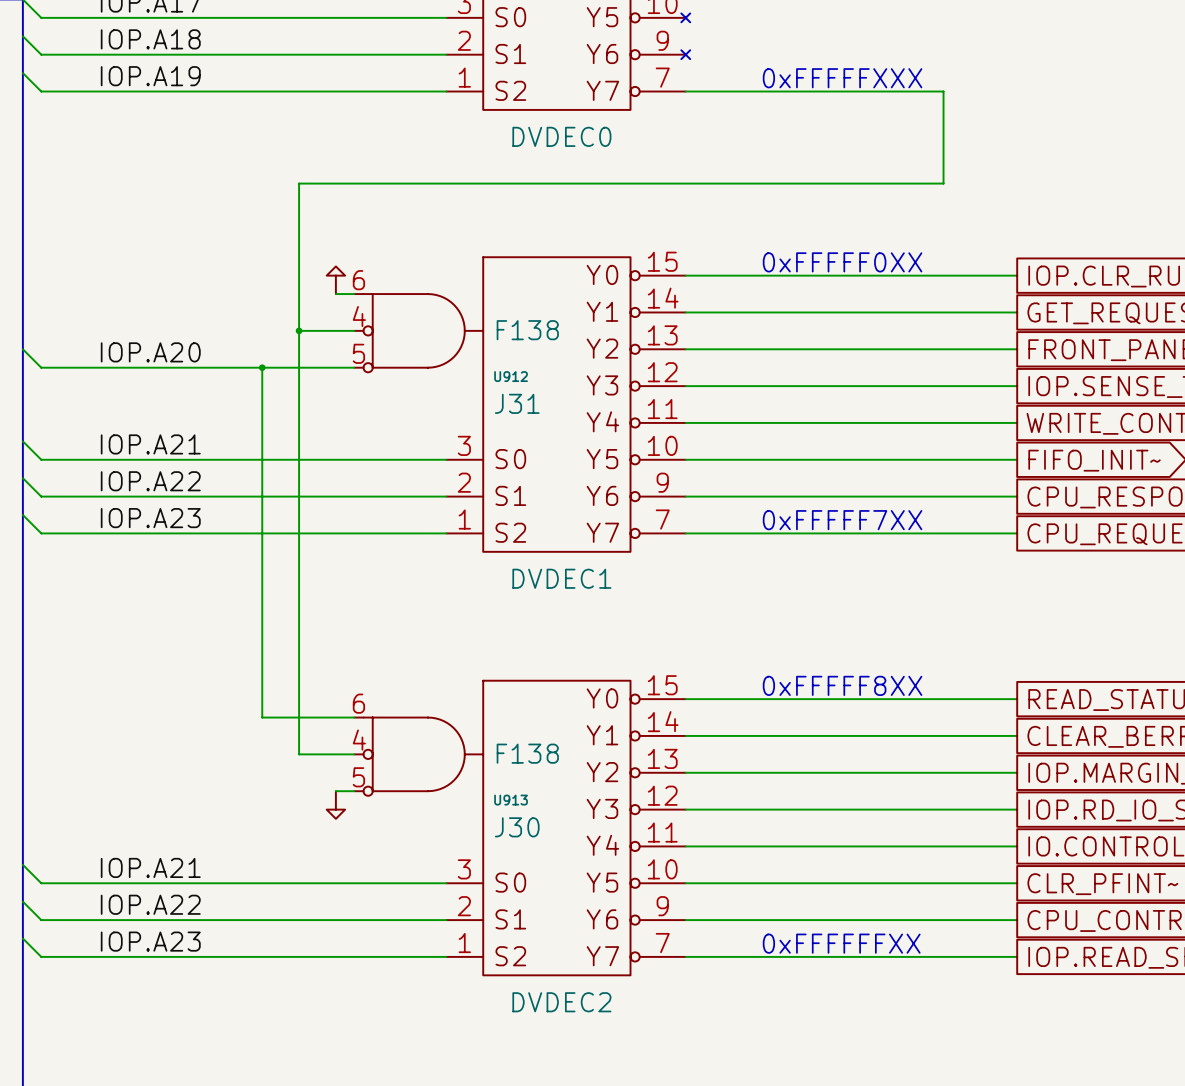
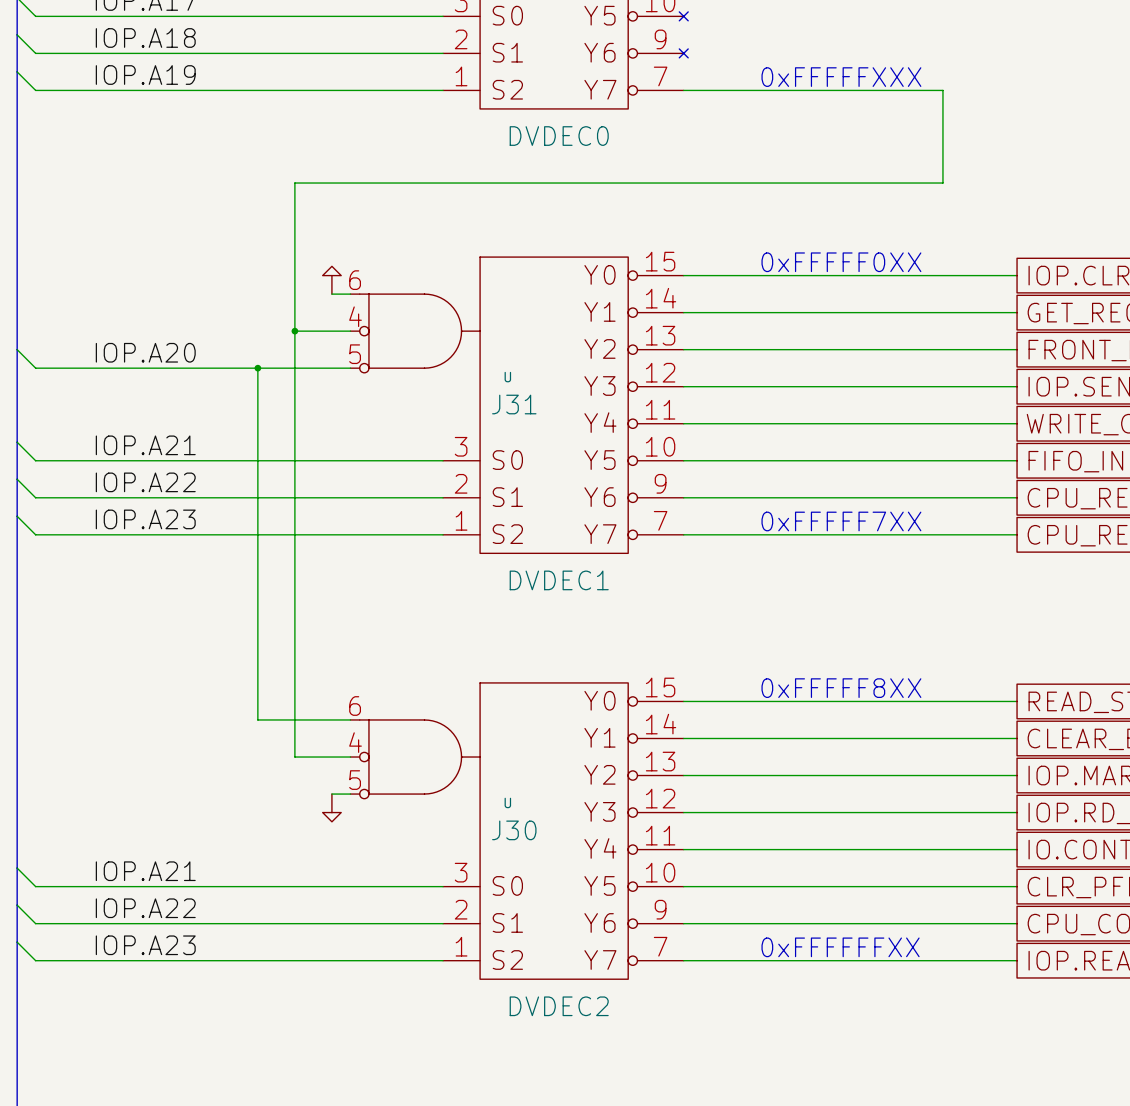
U912 value: F138 (527, 330) -> none
U912 name: U912 (511, 376) -> U (507, 377)
U913 value: F138 (527, 753) -> none
U913 name: U913 (511, 800) -> U (507, 802)

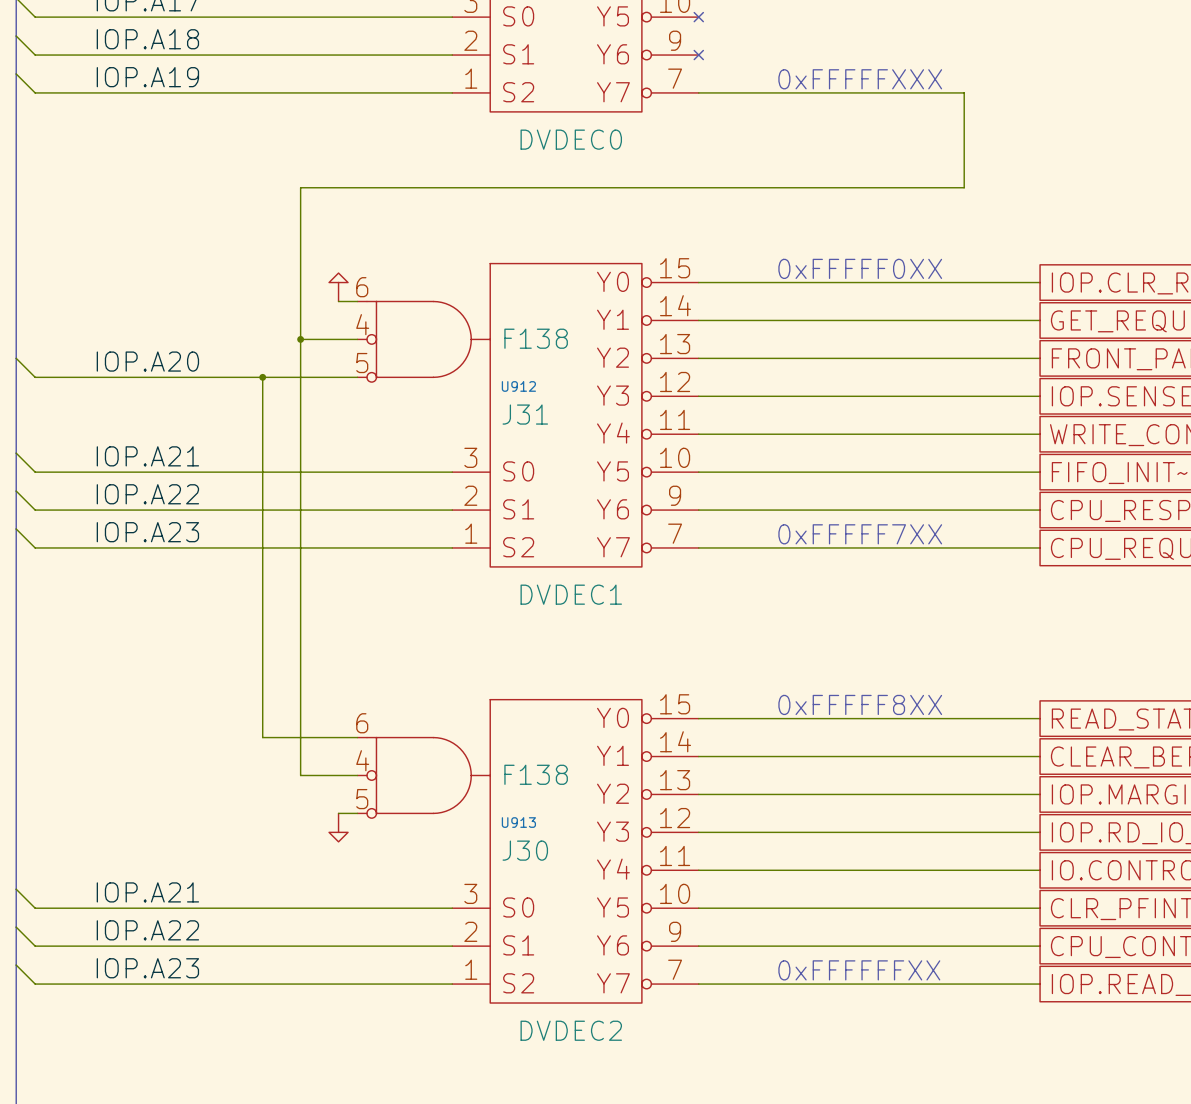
U value: none -> F138 (536, 338)
U name: U (507, 377) -> U912 (518, 386)
U value: none -> F138 (536, 774)
U name: U (507, 802) -> U913 (518, 822)

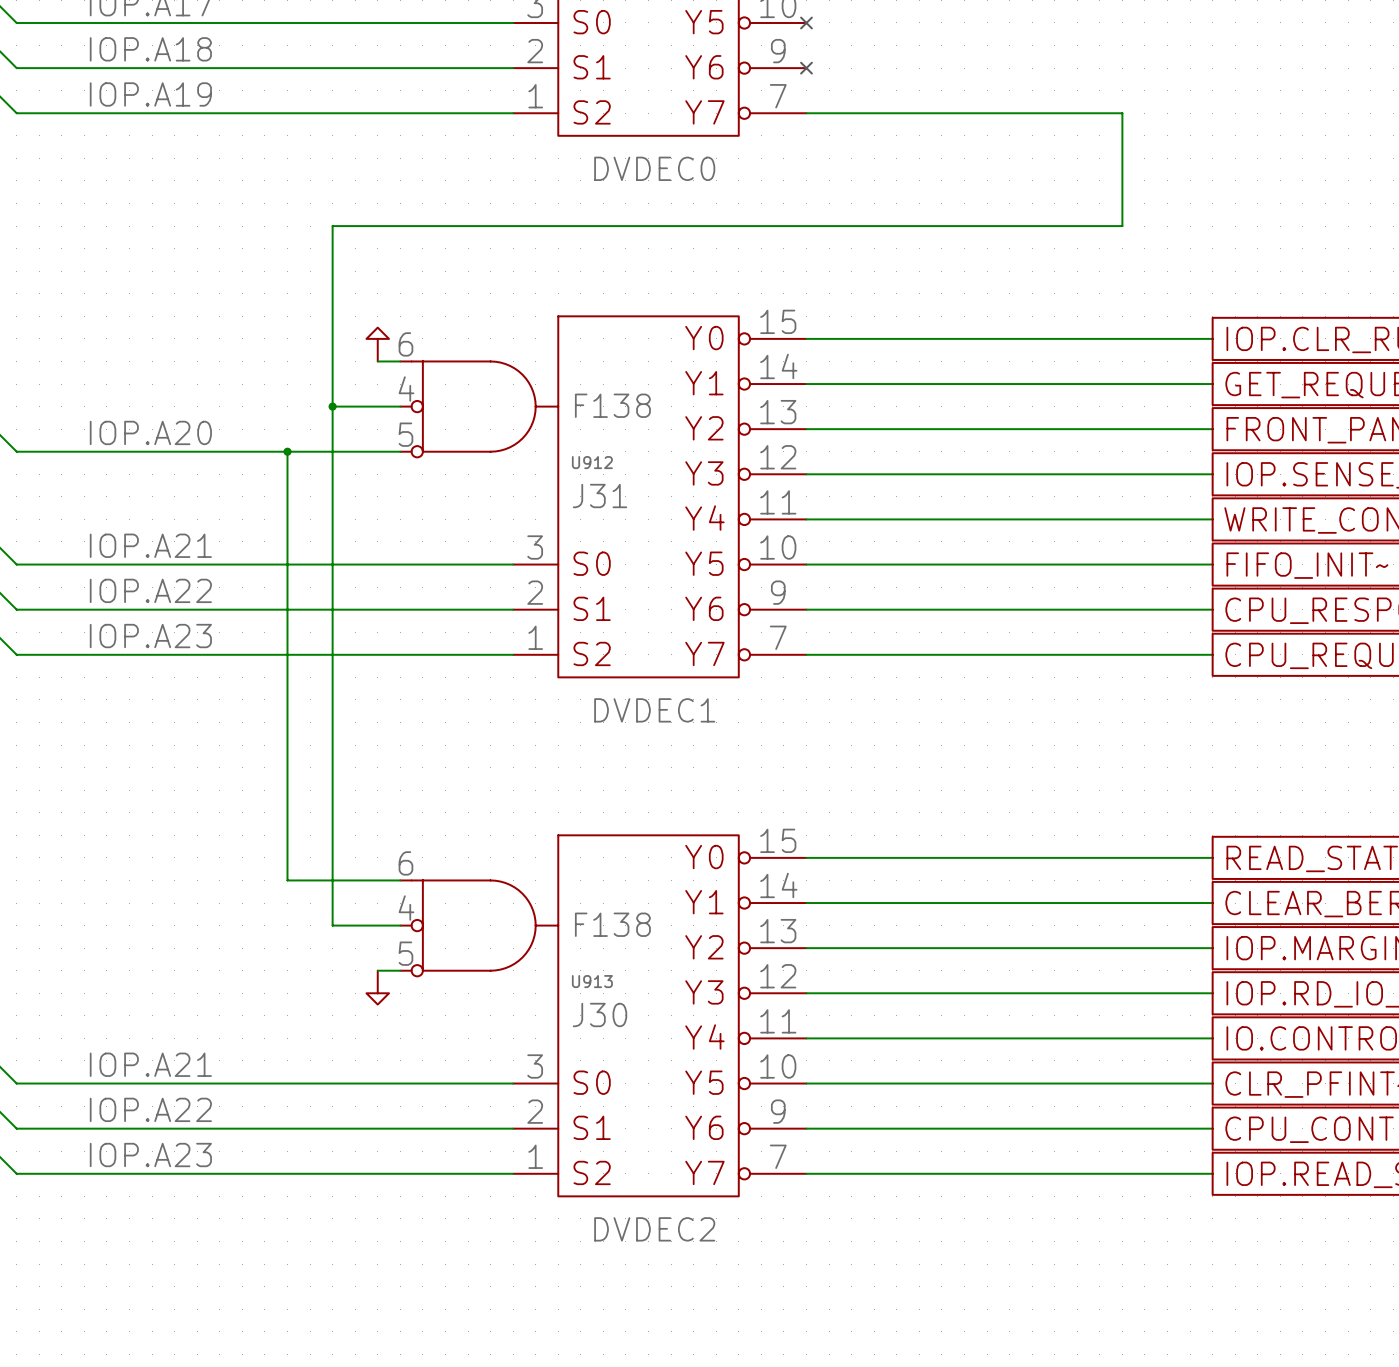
text: 0xFFFFFXXX (860, 79) -> none
text: 0xFFFFF0XX (860, 268) -> none
text: 0xFFFFF7XX (860, 534) -> none
text: 0xFFFFF8XX (860, 704) -> none
text: 0xFFFFFFXX (859, 970) -> none

